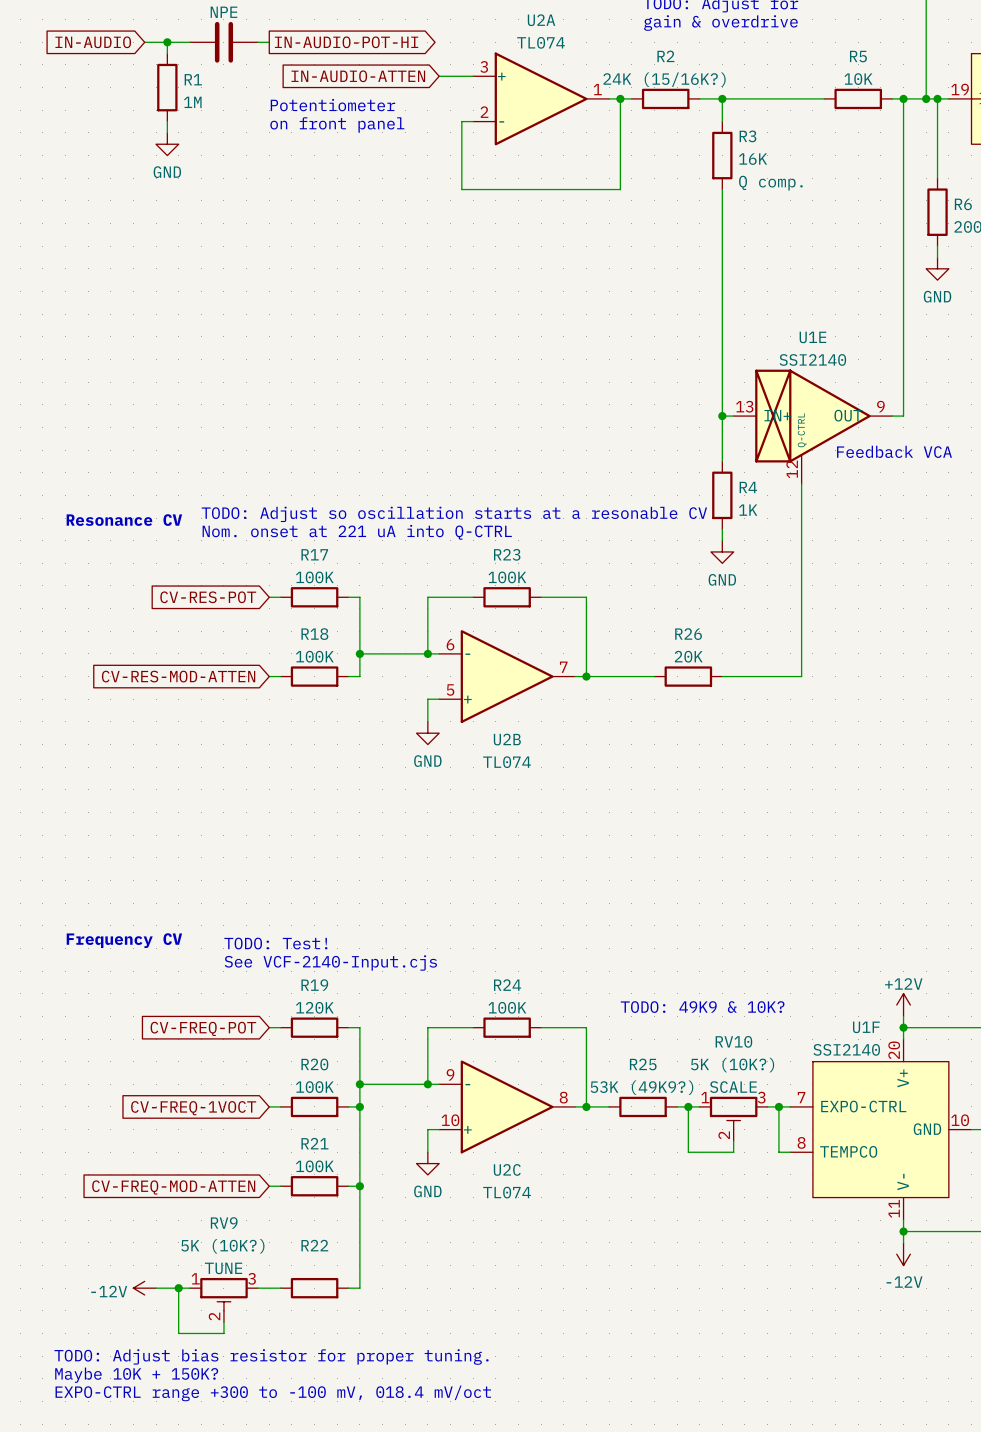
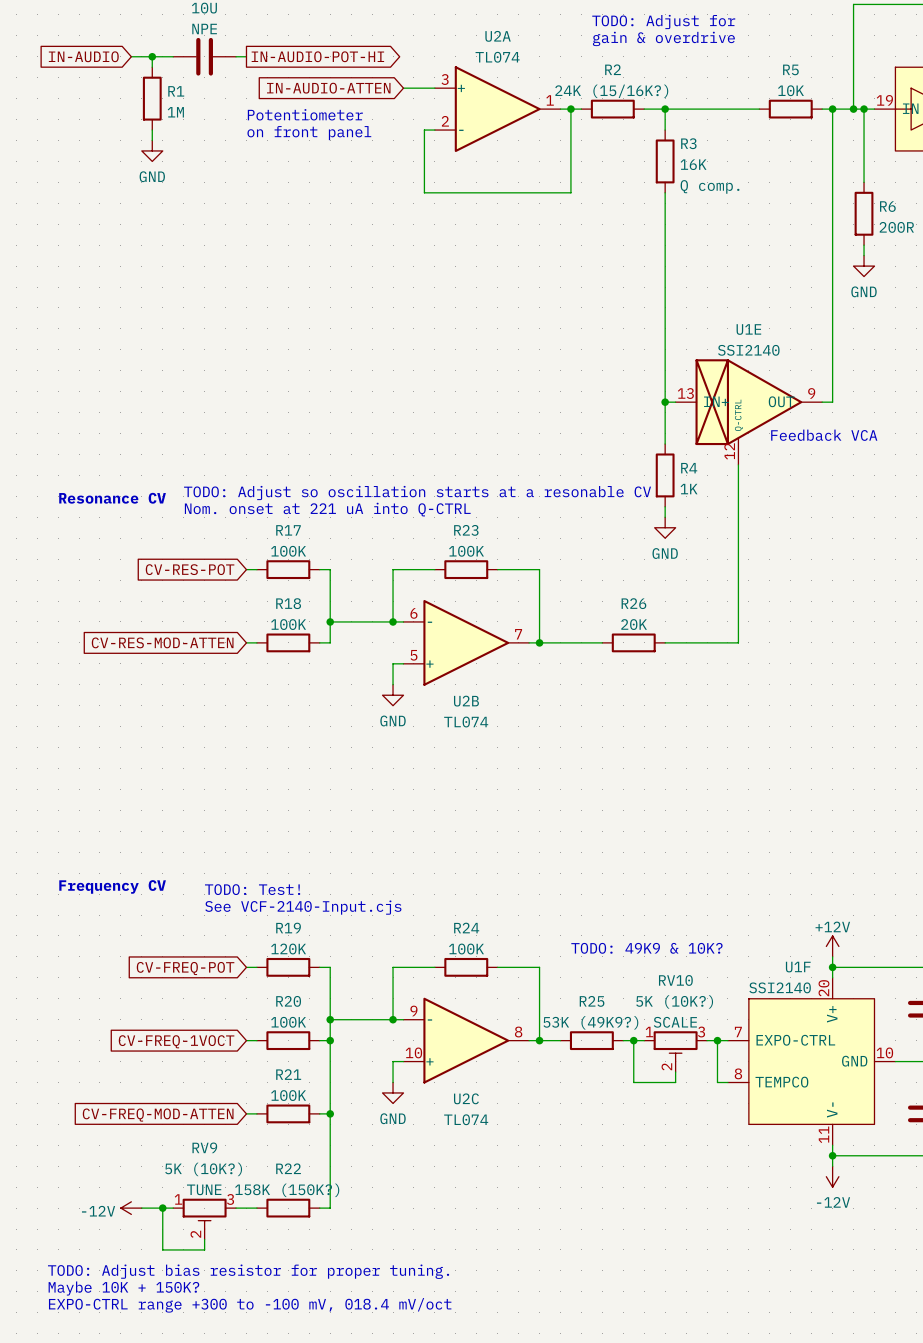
R22 value: none -> 158K (150K?) (287, 1190)

